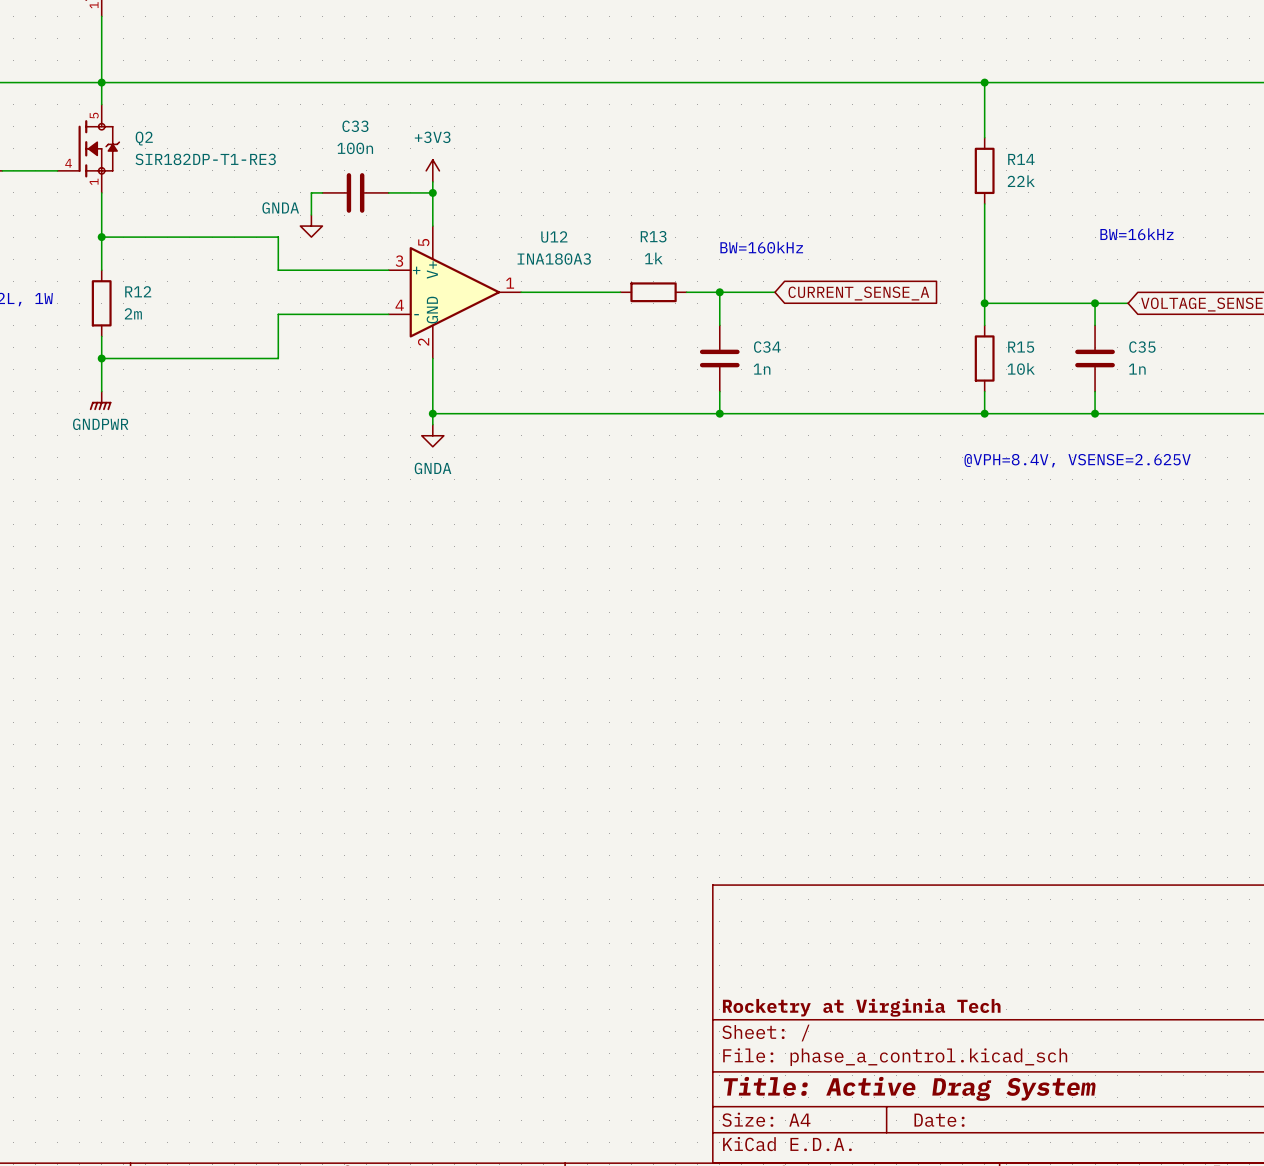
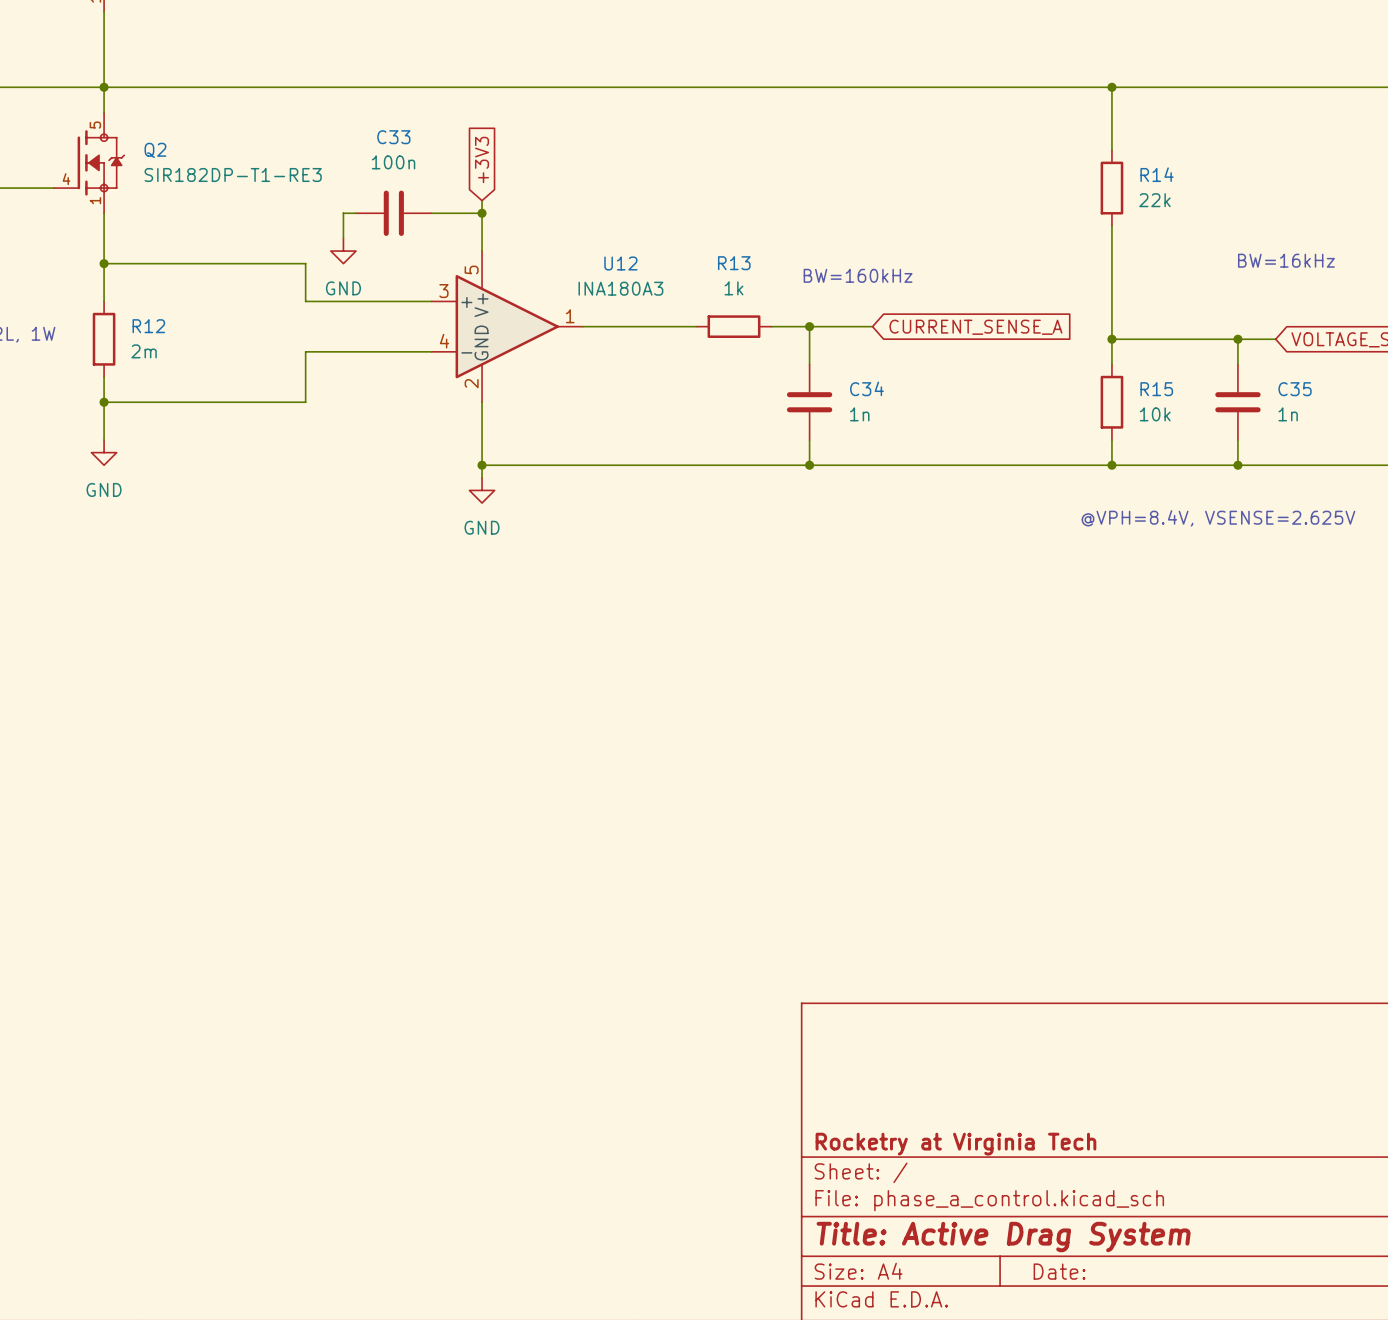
global label: none -> +3V3 (482, 160)
power symbol: +3V3 (432, 170) -> none
power symbol: GNDA (311, 226) -> GND (343, 251)
power symbol: GNDPWR (100, 400) -> GND (104, 452)
power symbol: GNDA (432, 435) -> GND (482, 490)

